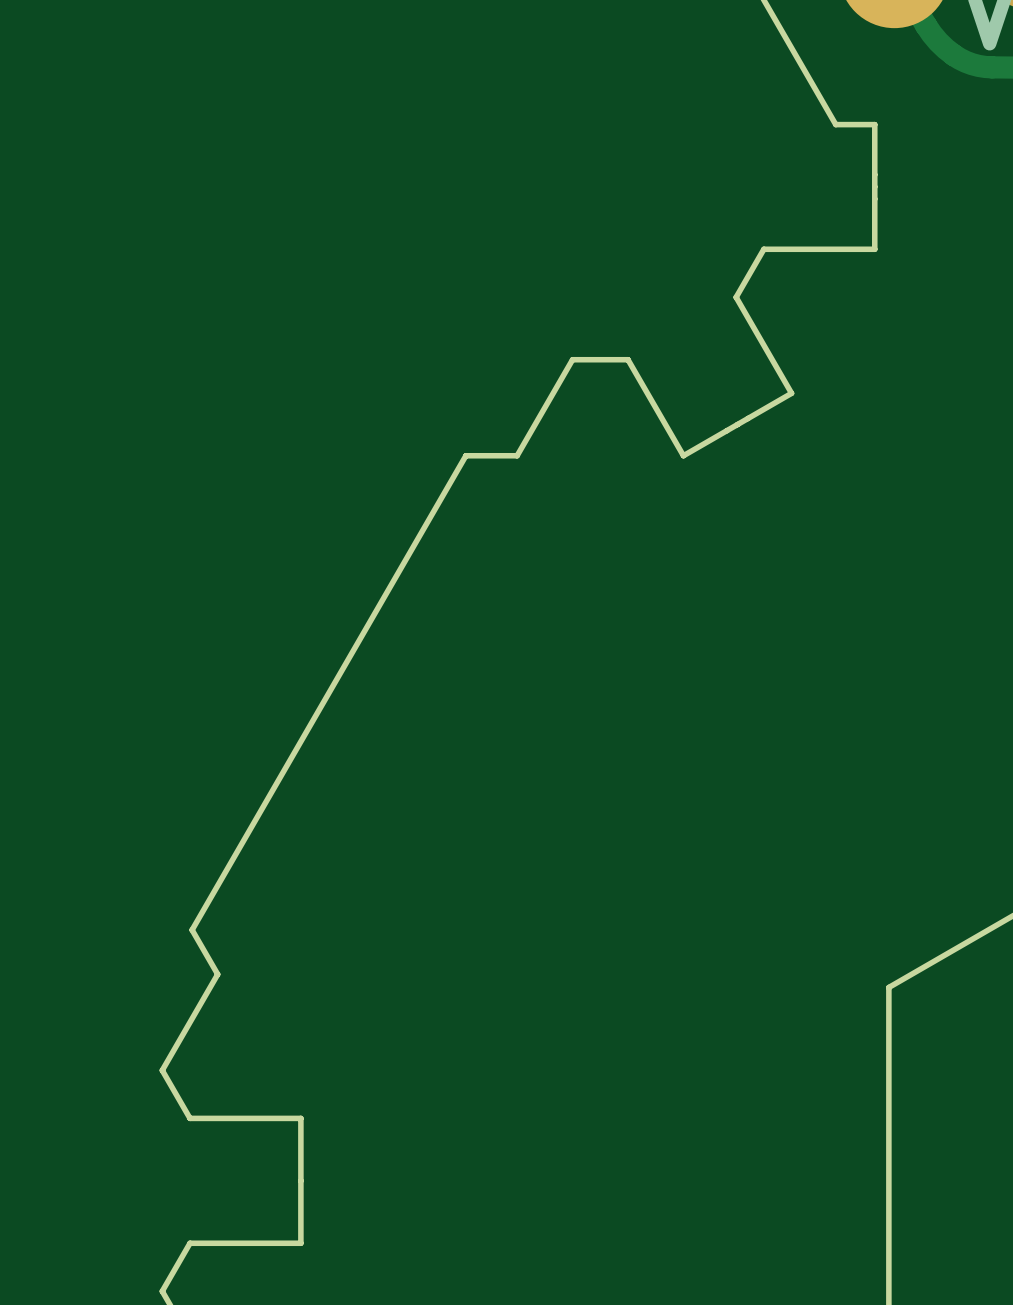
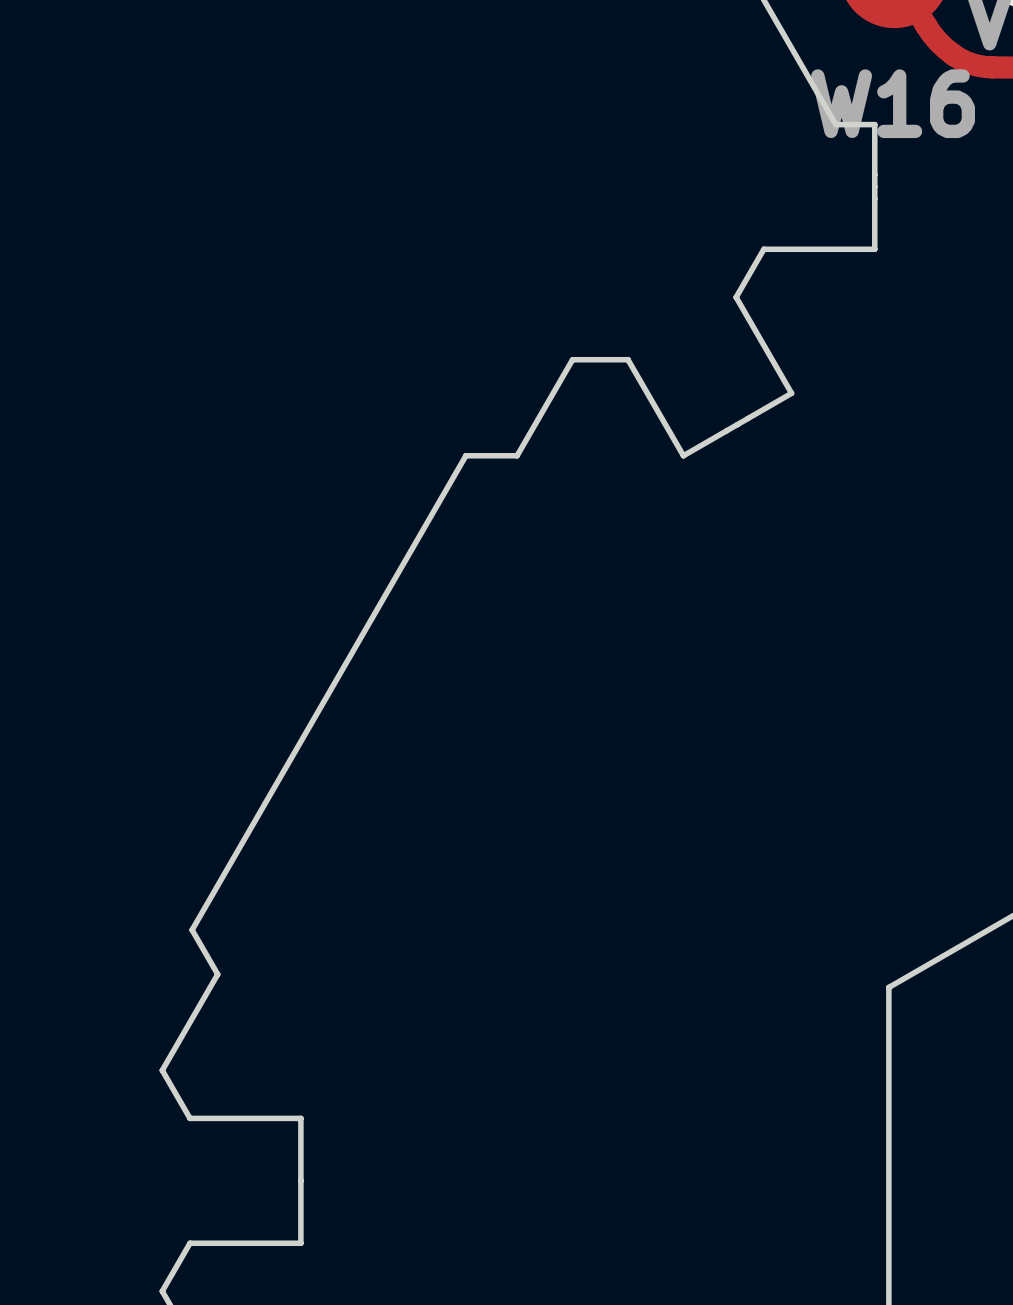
W16 name: none -> W16 (893, 103)

